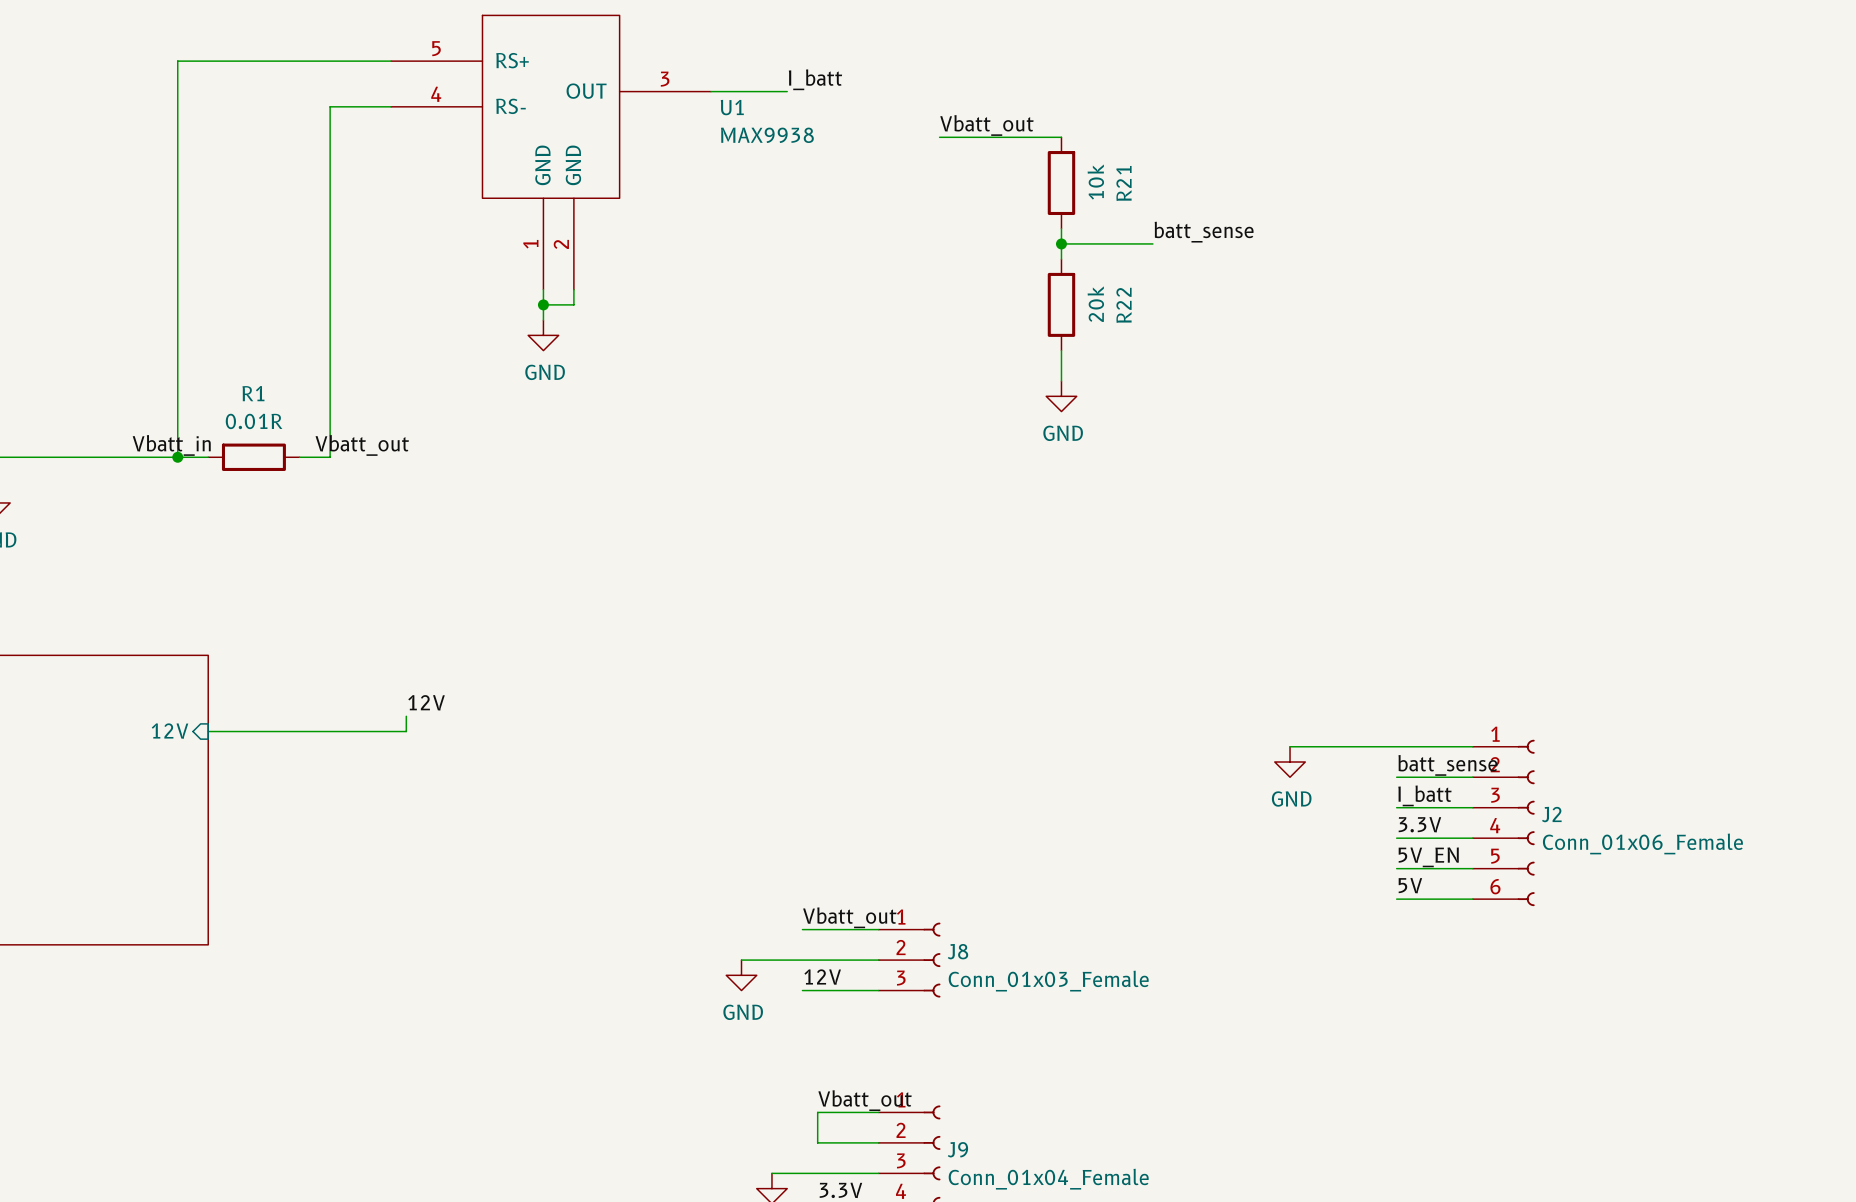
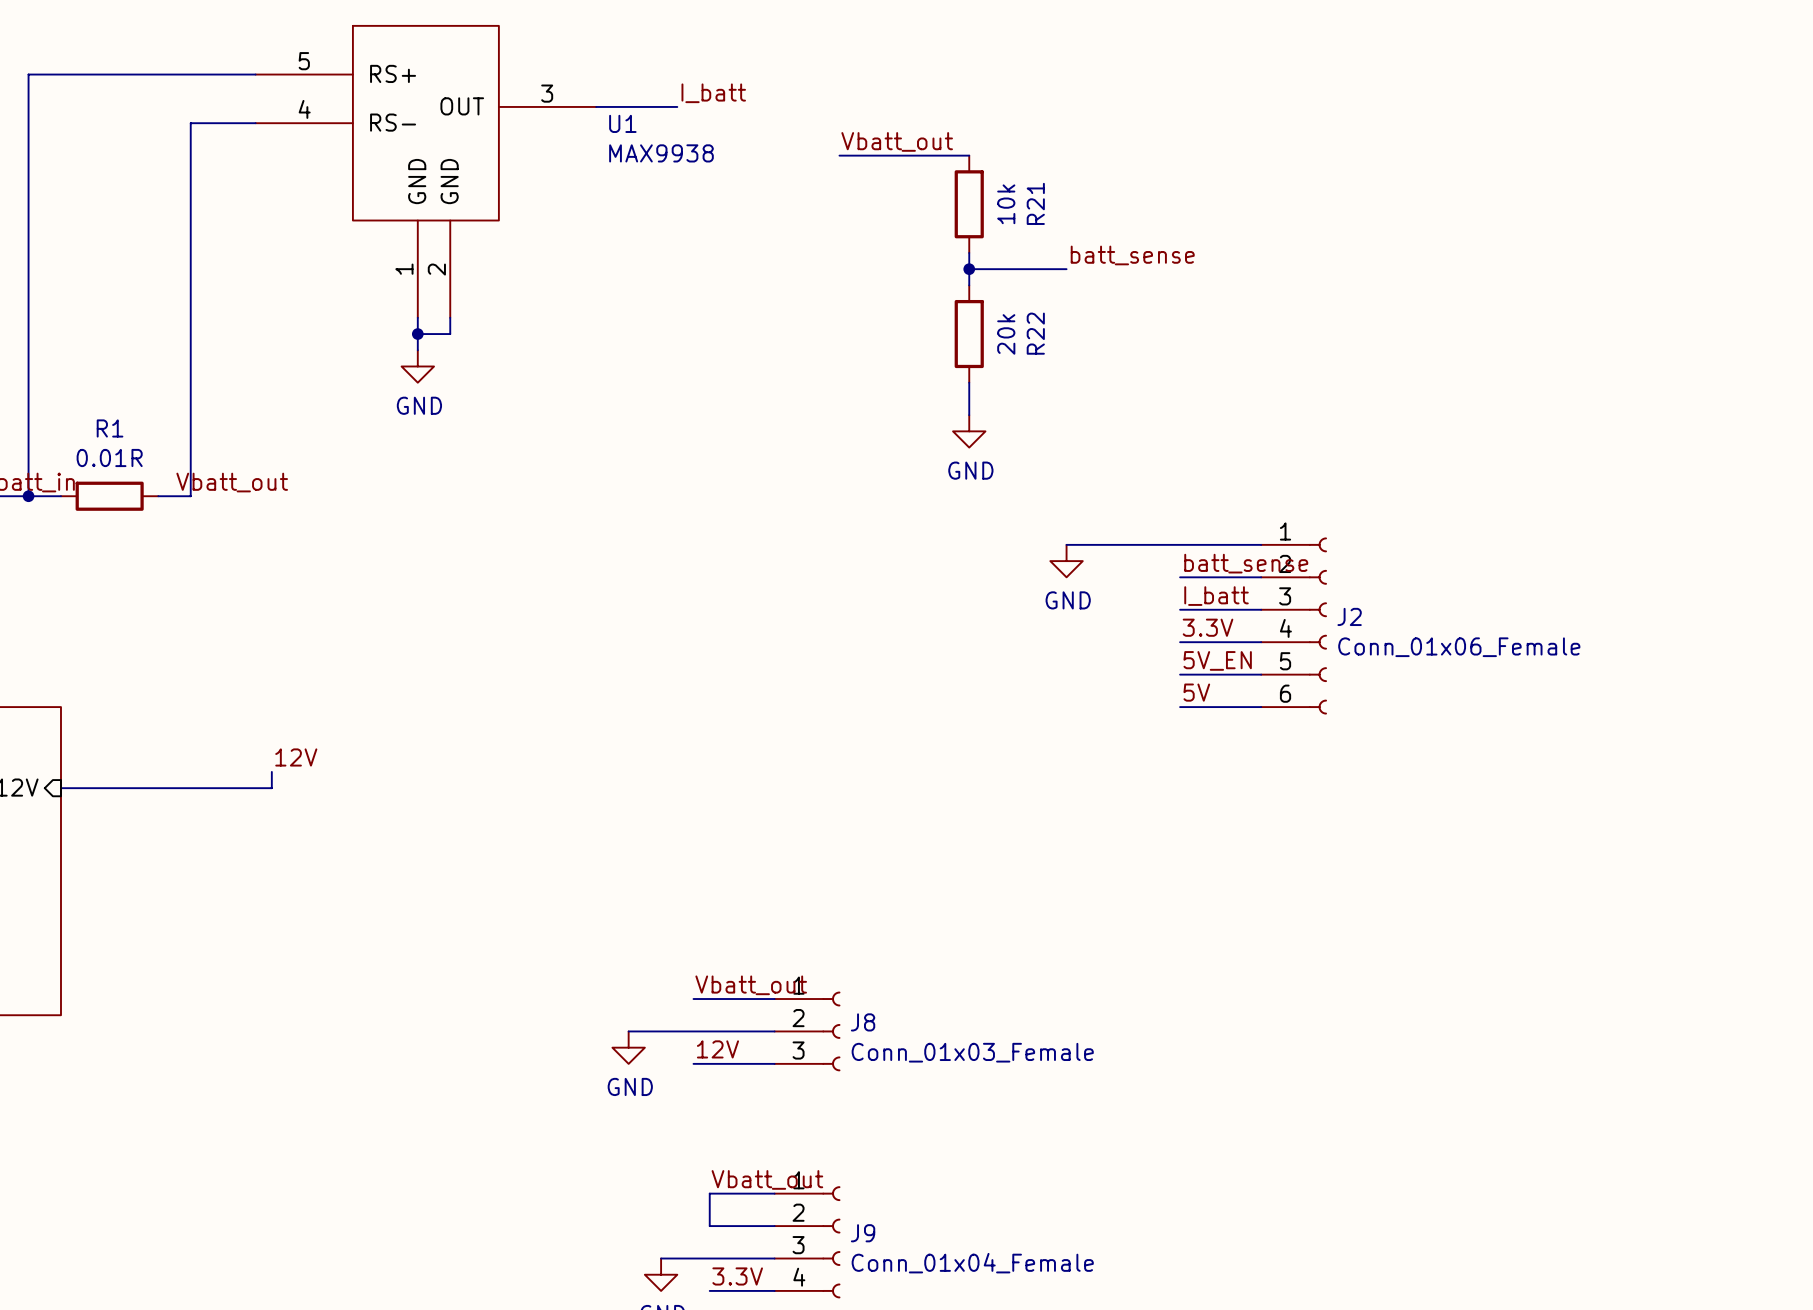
wire: (1290, 746) (1472, 746) -> (1066, 544) (1261, 544)
power symbol position: GND (1290, 762) -> GND (1066, 561)
label position: batt_sense (1447, 765) -> batt_sense (1246, 563)
wire: (1396, 777) (1472, 777) -> (1180, 577) (1261, 577)
label position: I_batt (1424, 795) -> I_batt (1216, 596)
wire: (1396, 807) (1472, 807) -> (1180, 609) (1261, 609)
J2 position: (1503, 822) -> (1294, 625)
label position: 3.3V (1419, 824) -> 3.3V (1208, 627)
wire: (1396, 838) (1472, 838) -> (1180, 642) (1261, 642)
label position: 5V_EN (1428, 857) -> 5V_EN (1217, 660)
wire: (1396, 868) (1472, 868) -> (1180, 674) (1261, 674)
label position: 5V (1410, 885) -> 5V (1196, 692)
wire: (1396, 899) (1472, 899) -> (1180, 707) (1261, 707)

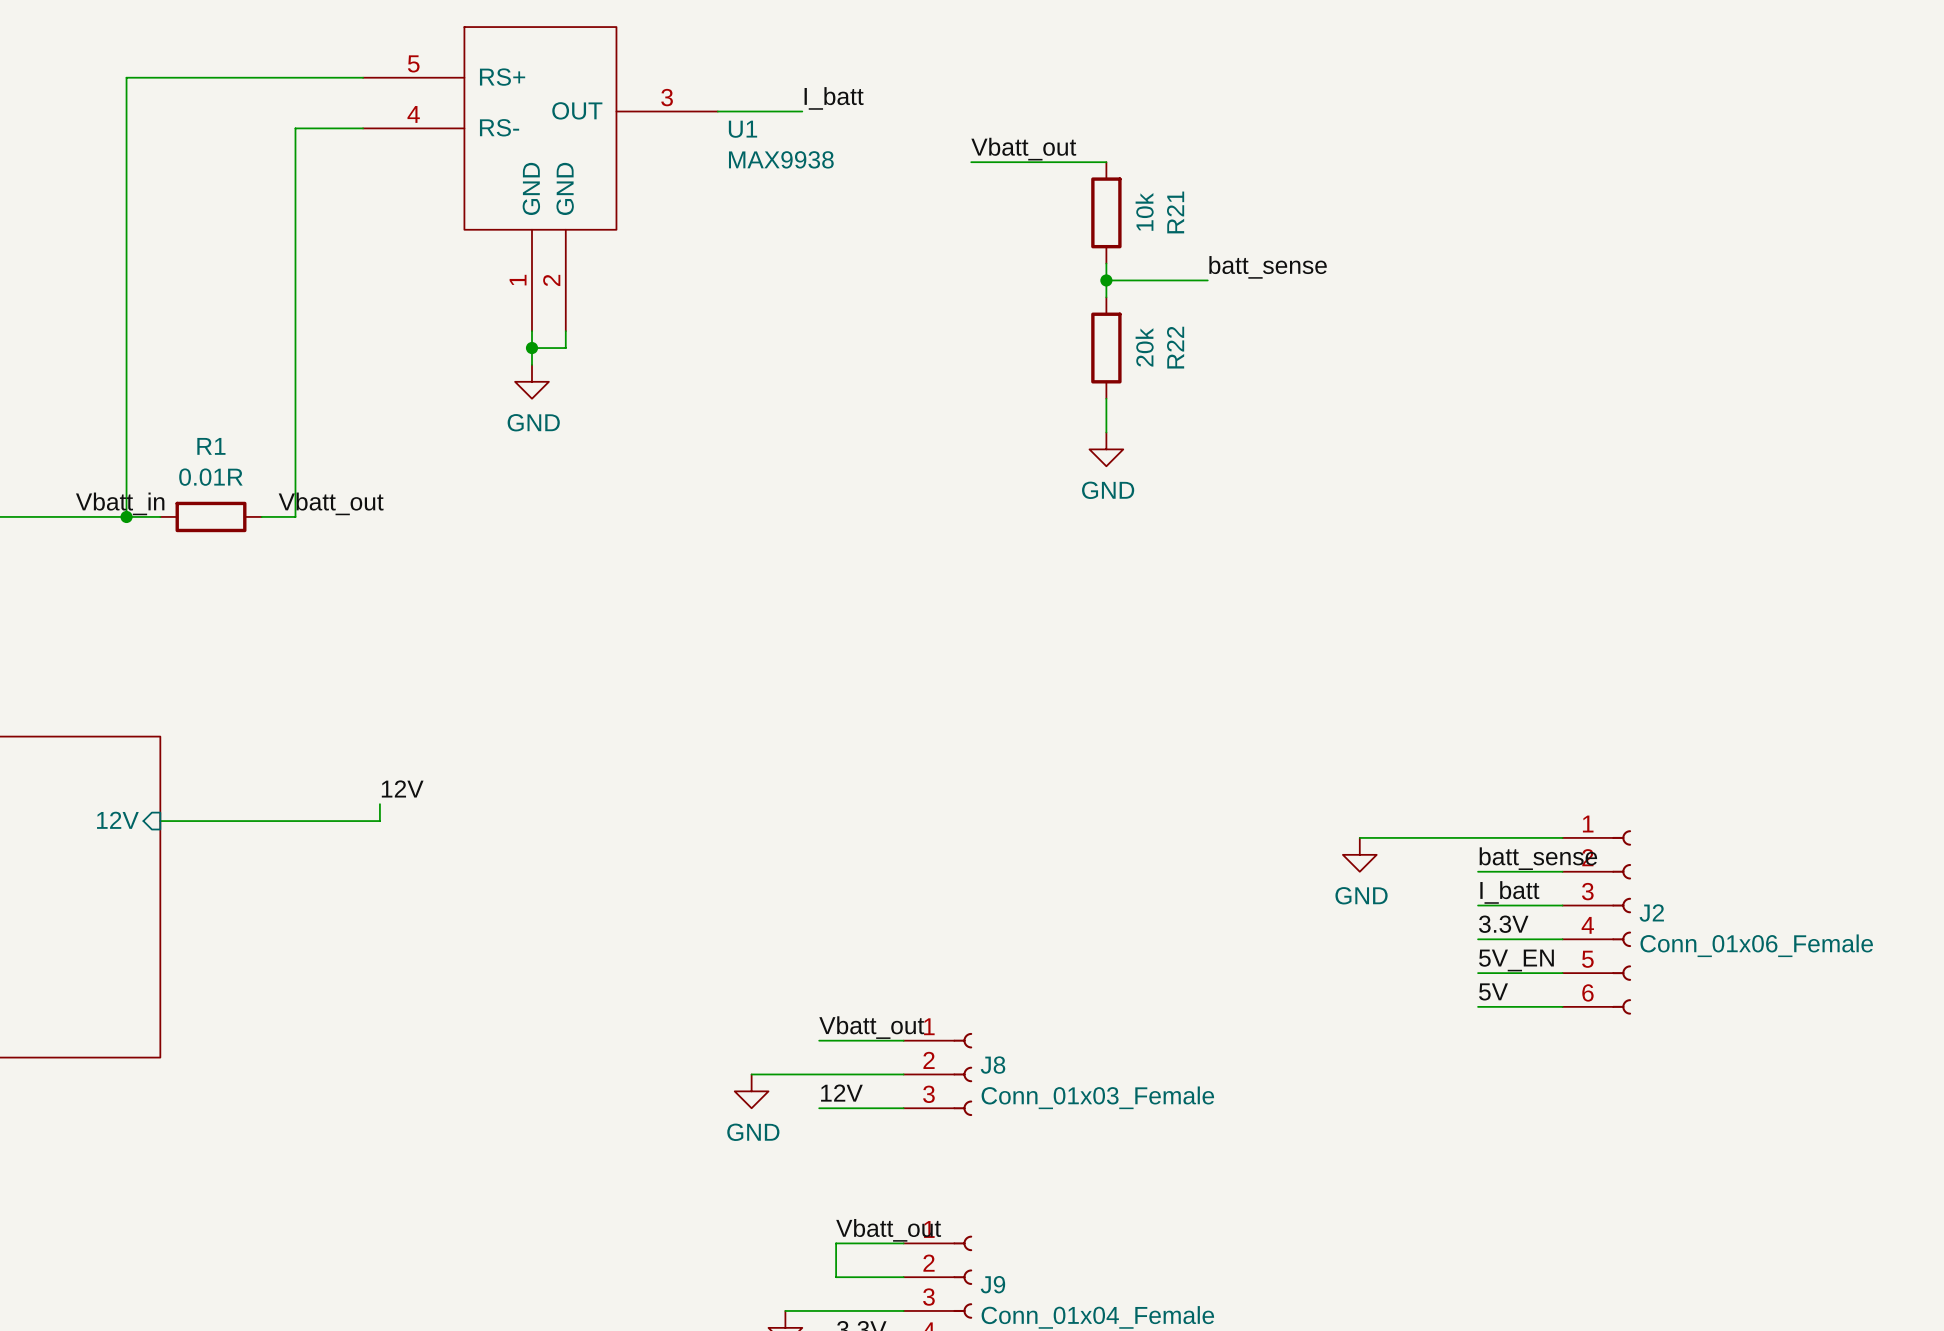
wire: (1066, 544) (1261, 544) -> (1359, 837) (1562, 837)
power symbol position: GND (1066, 561) -> GND (1359, 854)
label position: batt_sense (1246, 563) -> batt_sense (1538, 858)
wire: (1180, 577) (1261, 577) -> (1478, 871) (1562, 871)
label position: I_batt (1216, 596) -> I_batt (1509, 892)
wire: (1180, 609) (1261, 609) -> (1478, 905) (1562, 905)
J2 position: (1294, 625) -> (1596, 922)
label position: 3.3V (1208, 627) -> 3.3V (1503, 924)
wire: (1180, 642) (1261, 642) -> (1478, 939) (1562, 939)
label position: 5V_EN (1217, 660) -> 5V_EN (1516, 960)
wire: (1180, 674) (1261, 674) -> (1478, 973) (1562, 973)
label position: 5V (1196, 692) -> 5V (1493, 991)
wire: (1180, 707) (1261, 707) -> (1478, 1006) (1562, 1006)

